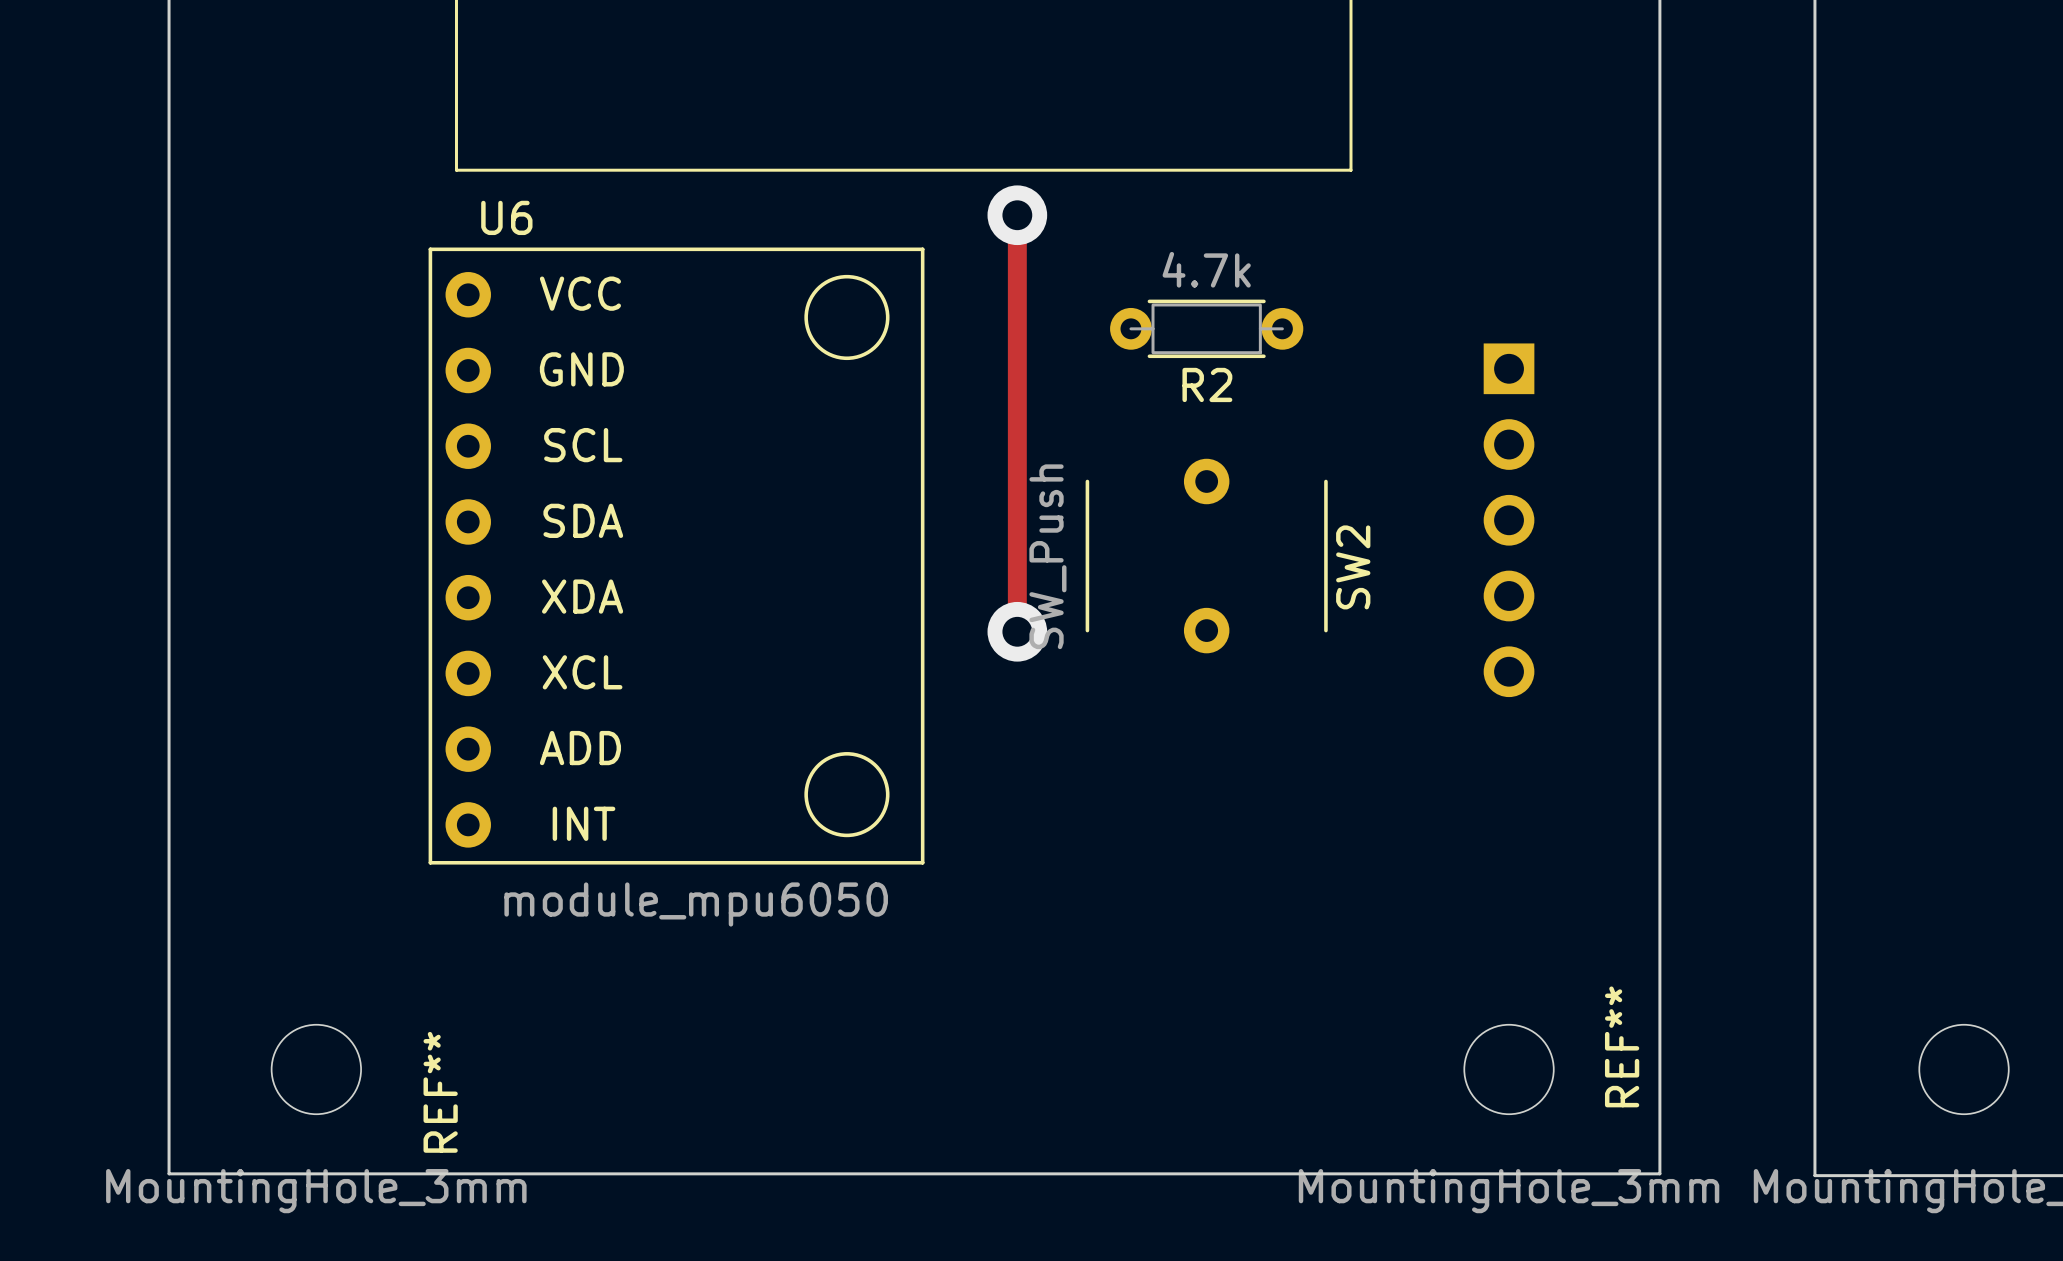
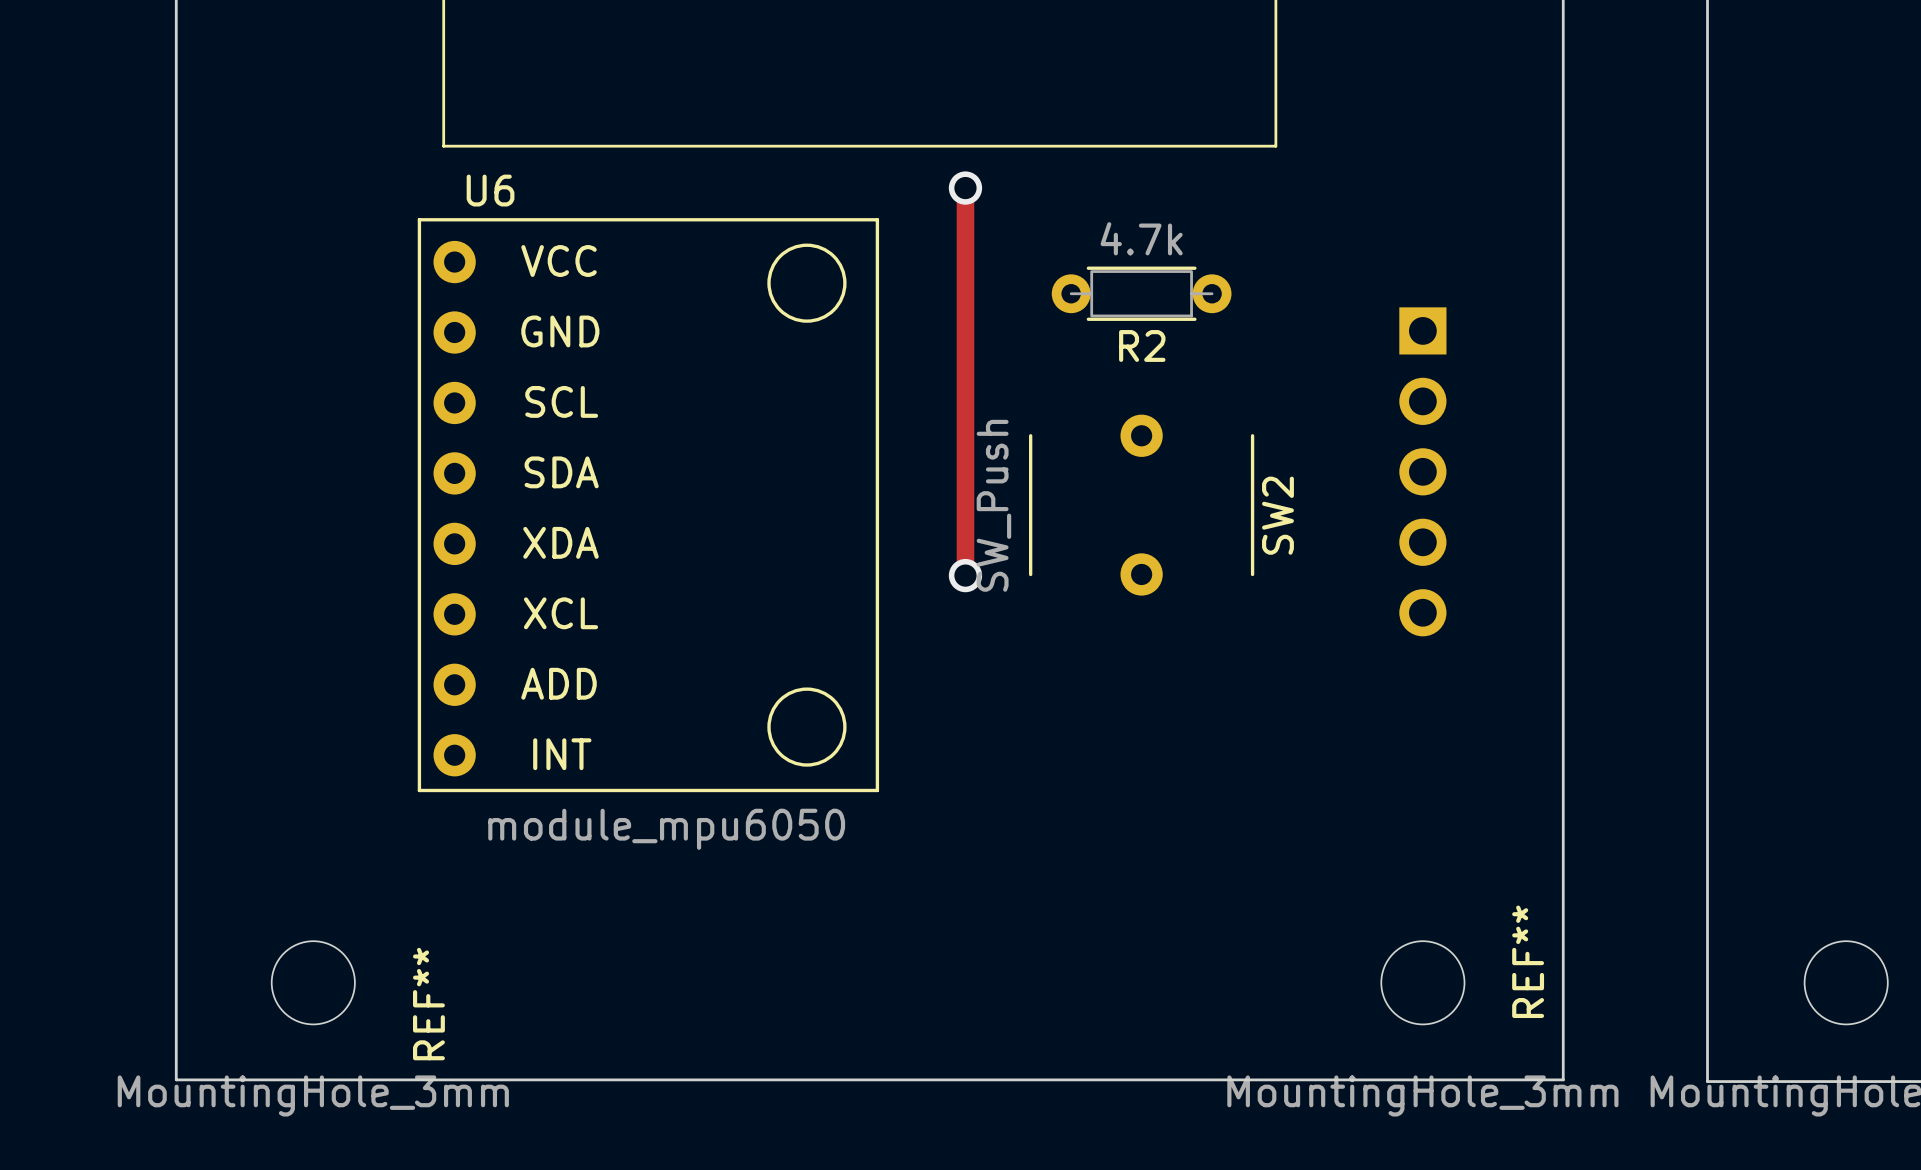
via size: [987, 185, 1048, 246] -> [948, 171, 983, 205]
via size: [987, 601, 1048, 662] -> [948, 558, 983, 593]

